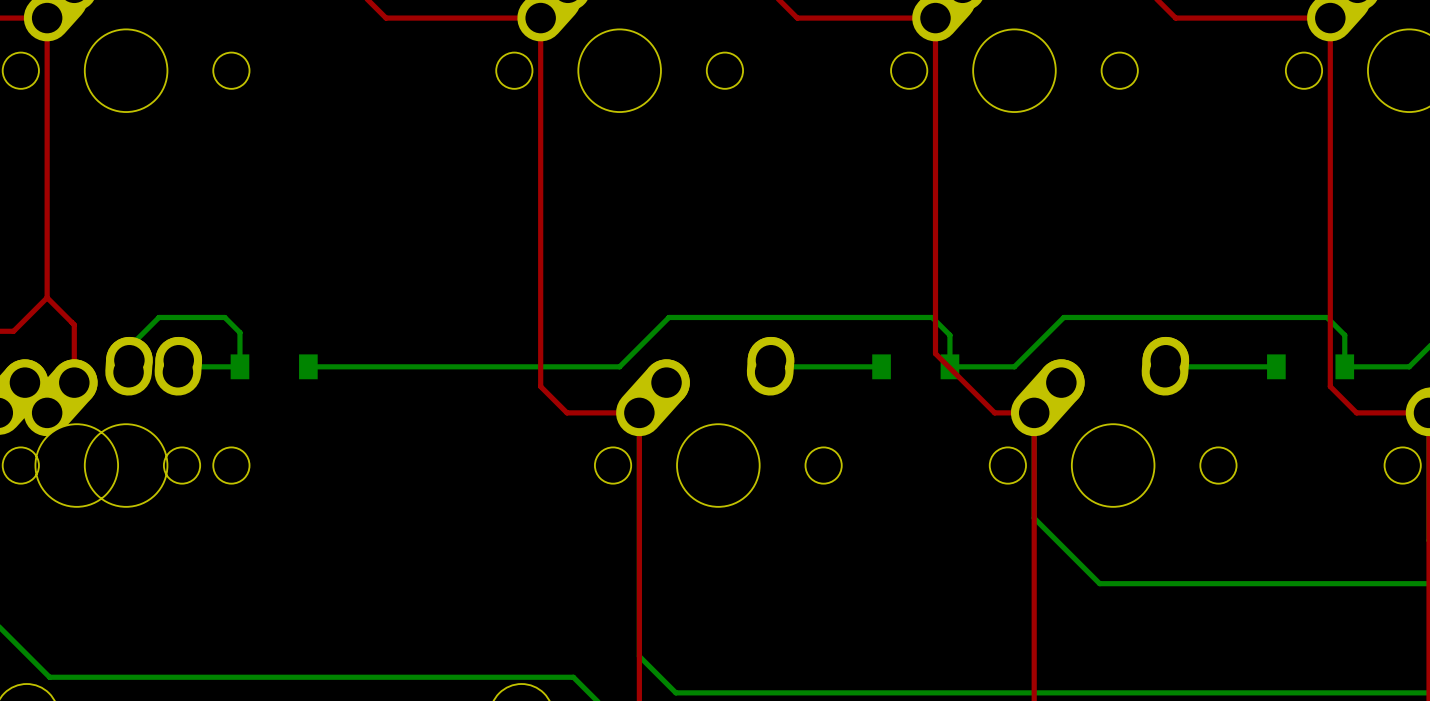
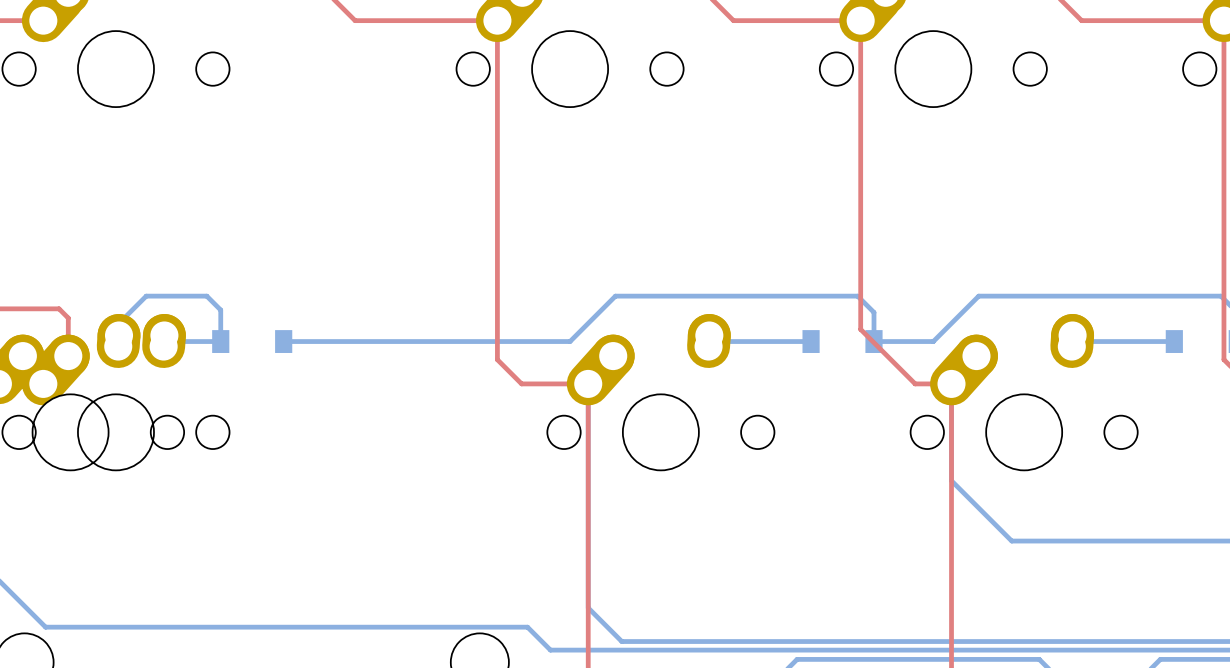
top track: (47, 18) (47, 297) -> none
top track: (47, 297) (74, 324) (74, 341) -> (12, 308) (59, 308) (68, 318)
top track: (47, 297) (13, 331) -> none

